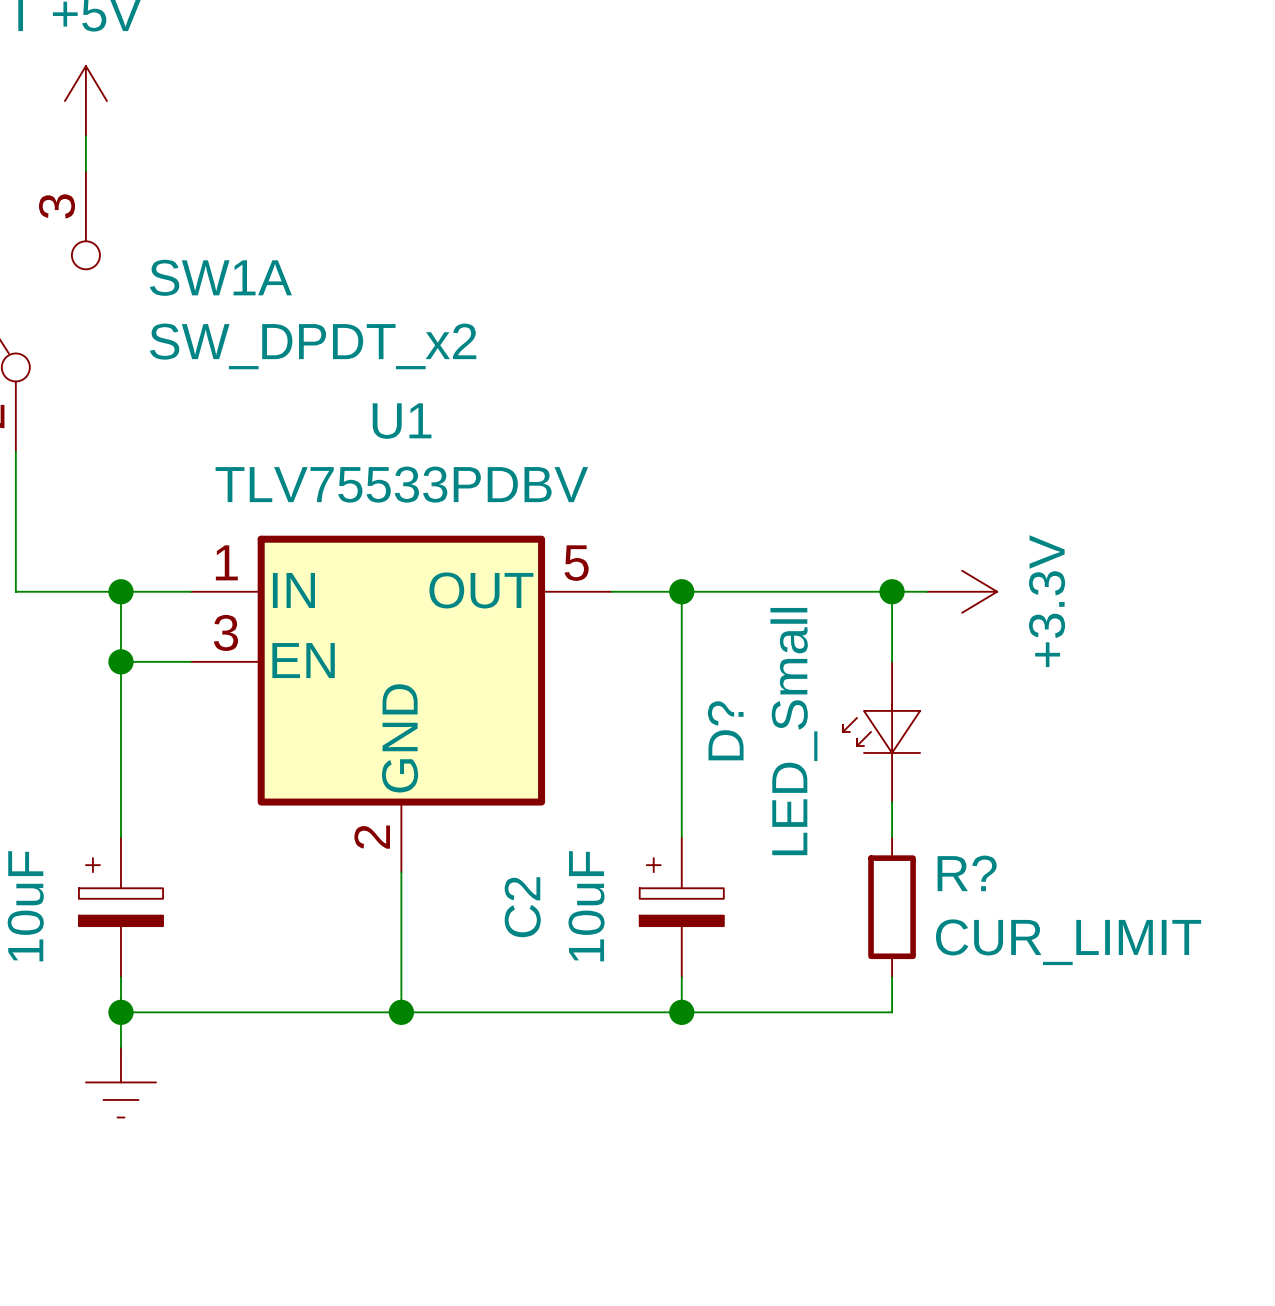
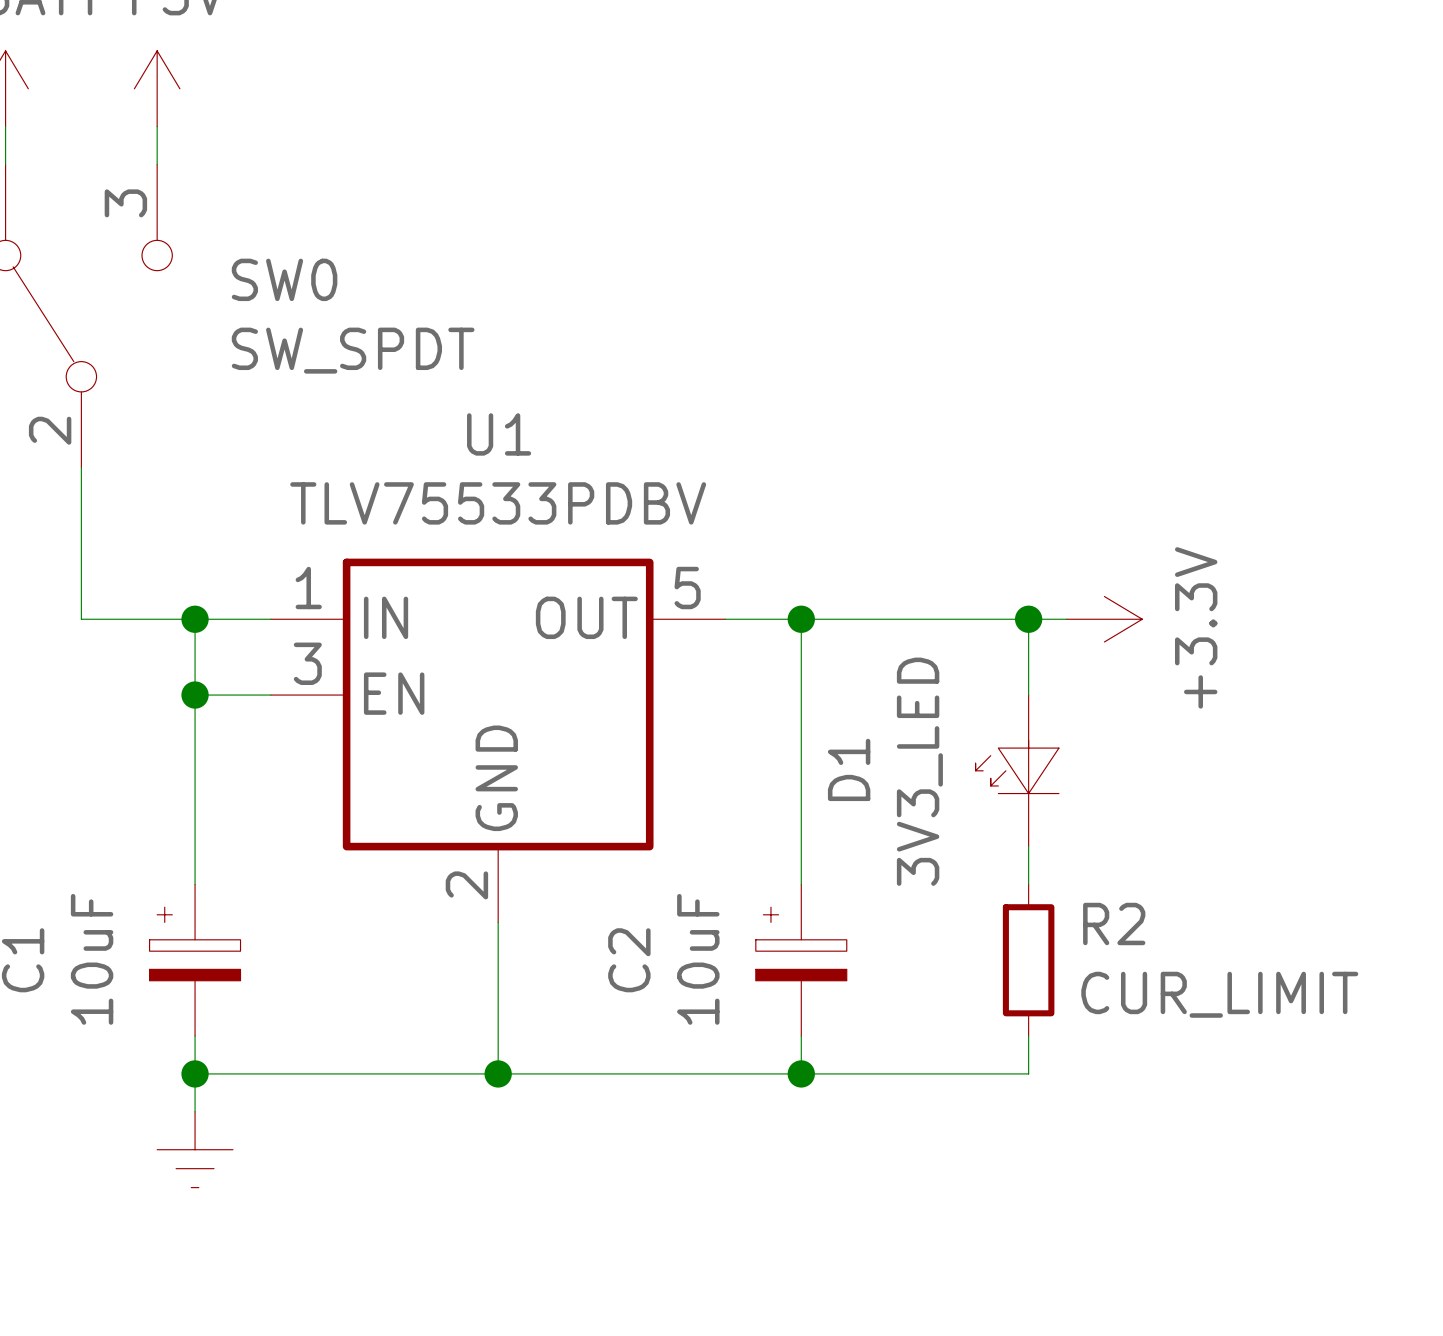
SW1A name: SW1A (220, 277) -> SW0 (284, 279)
SW1A value: SW_DPDT_x2 (313, 346) -> SW_SPDT (353, 350)
D? name: D? (725, 730) -> D1 (849, 769)
D? value: LED_Small (793, 731) -> 3V3_LED (919, 771)
R? name: R? (967, 873) -> R2 (1114, 923)

